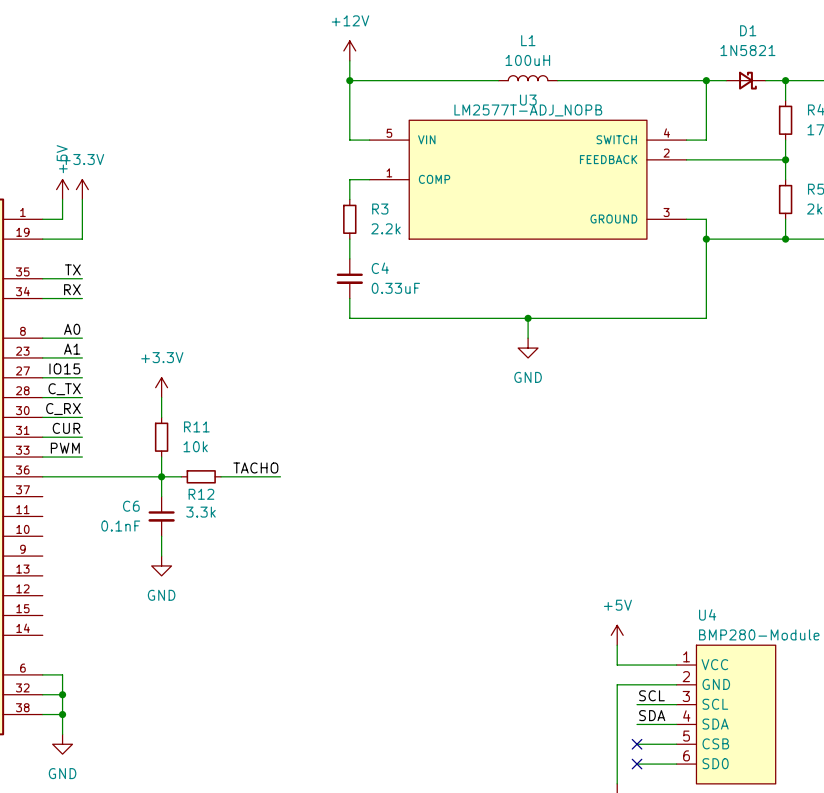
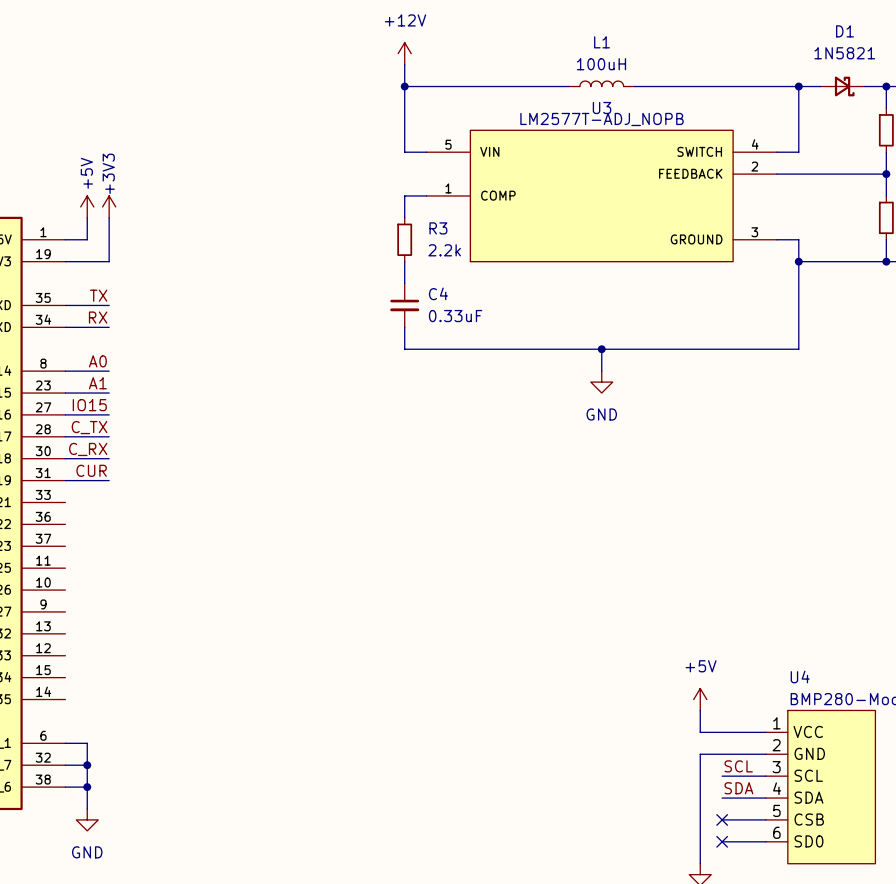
power symbol: +3.3V (82, 189) -> +3V3 (109, 206)
power symbol: +3.3V (161, 387) -> none
wire: (161, 397) (161, 417) -> none
R11: 10k (161, 437) -> none
label: PWM (65, 448) -> none
wire: (42, 457) (82, 457) -> none
wire: (161, 457) (161, 496) -> none
label: TACHO (255, 467) -> none
wire: (42, 476) (181, 476) -> none
junction: (161, 476) -> none
R12: 3.3k (201, 476) -> none
wire: (221, 476) (280, 476) -> none
C6: 0.1nF (161, 516) -> none
wire: (161, 536) (161, 556) -> none
power symbol: GND (161, 565) -> none

